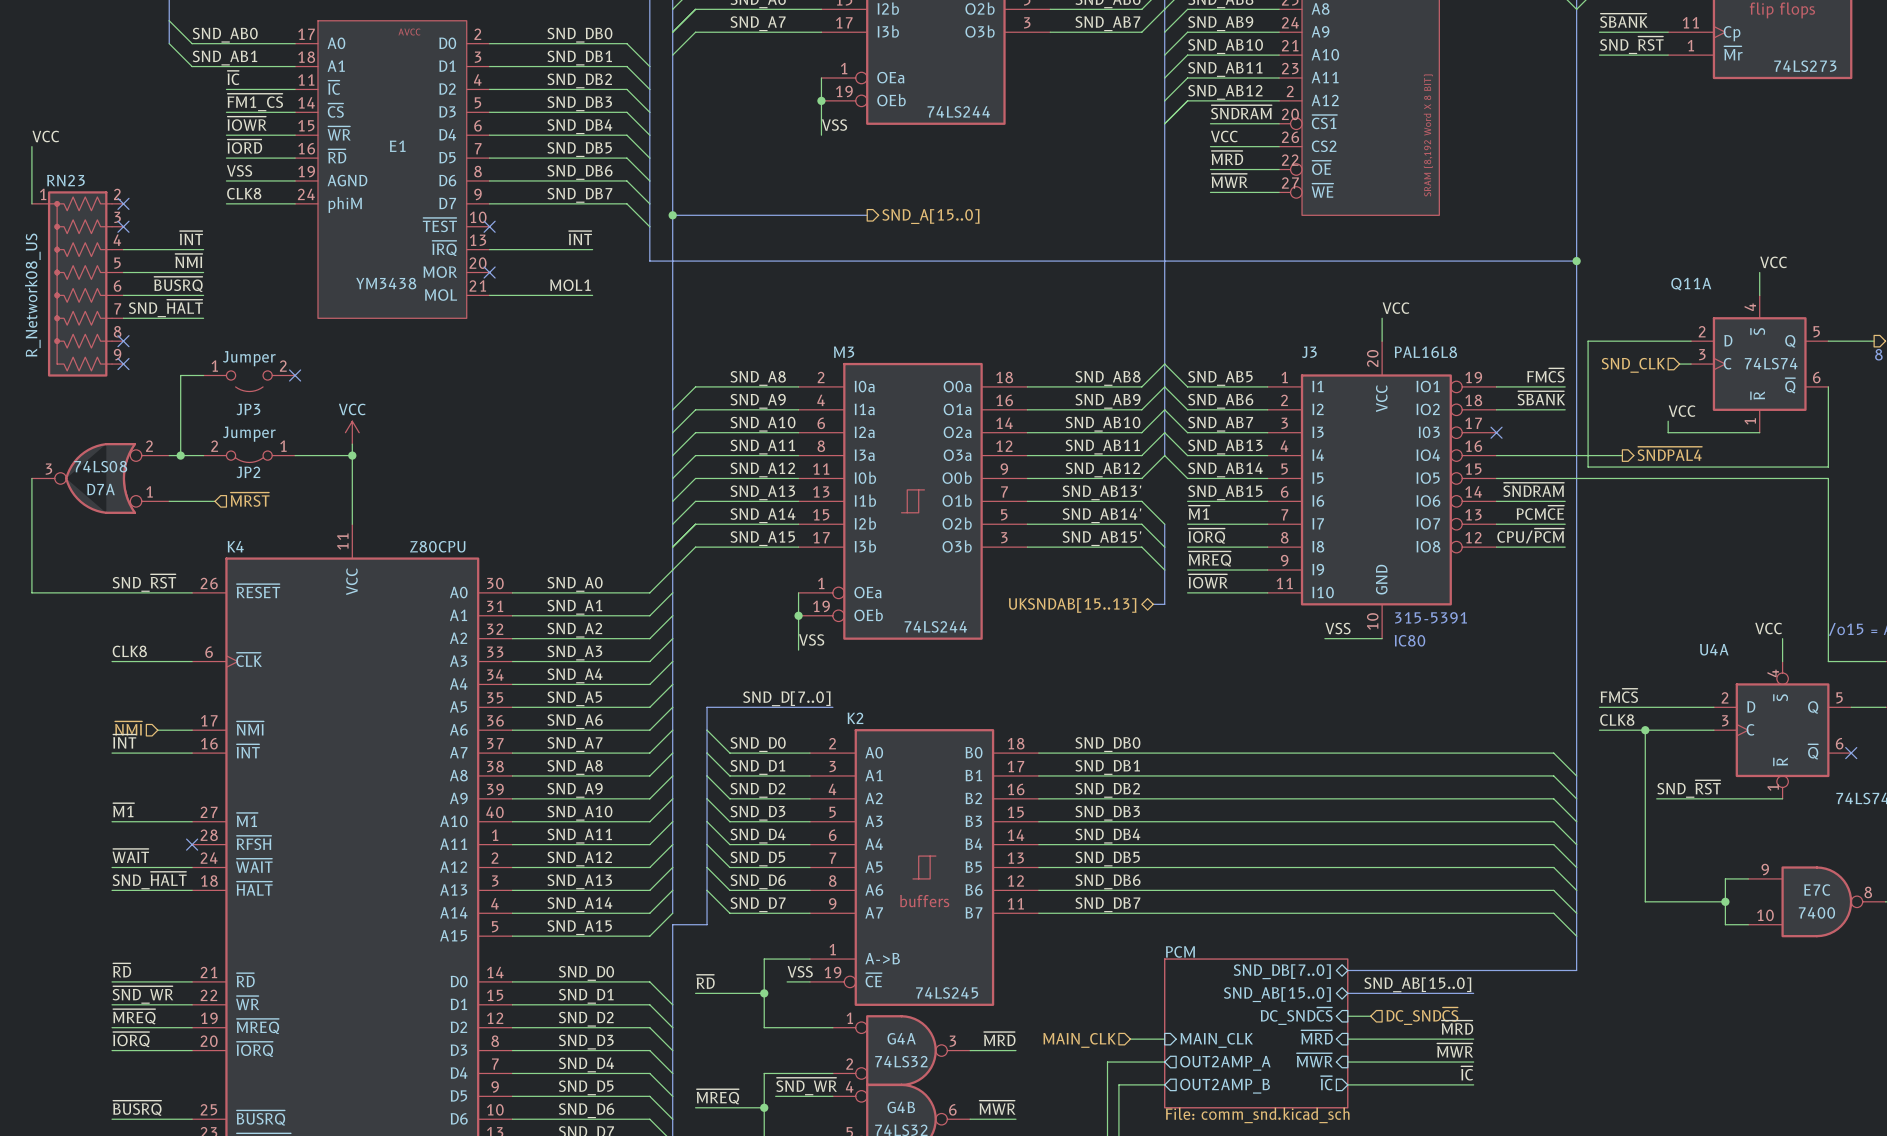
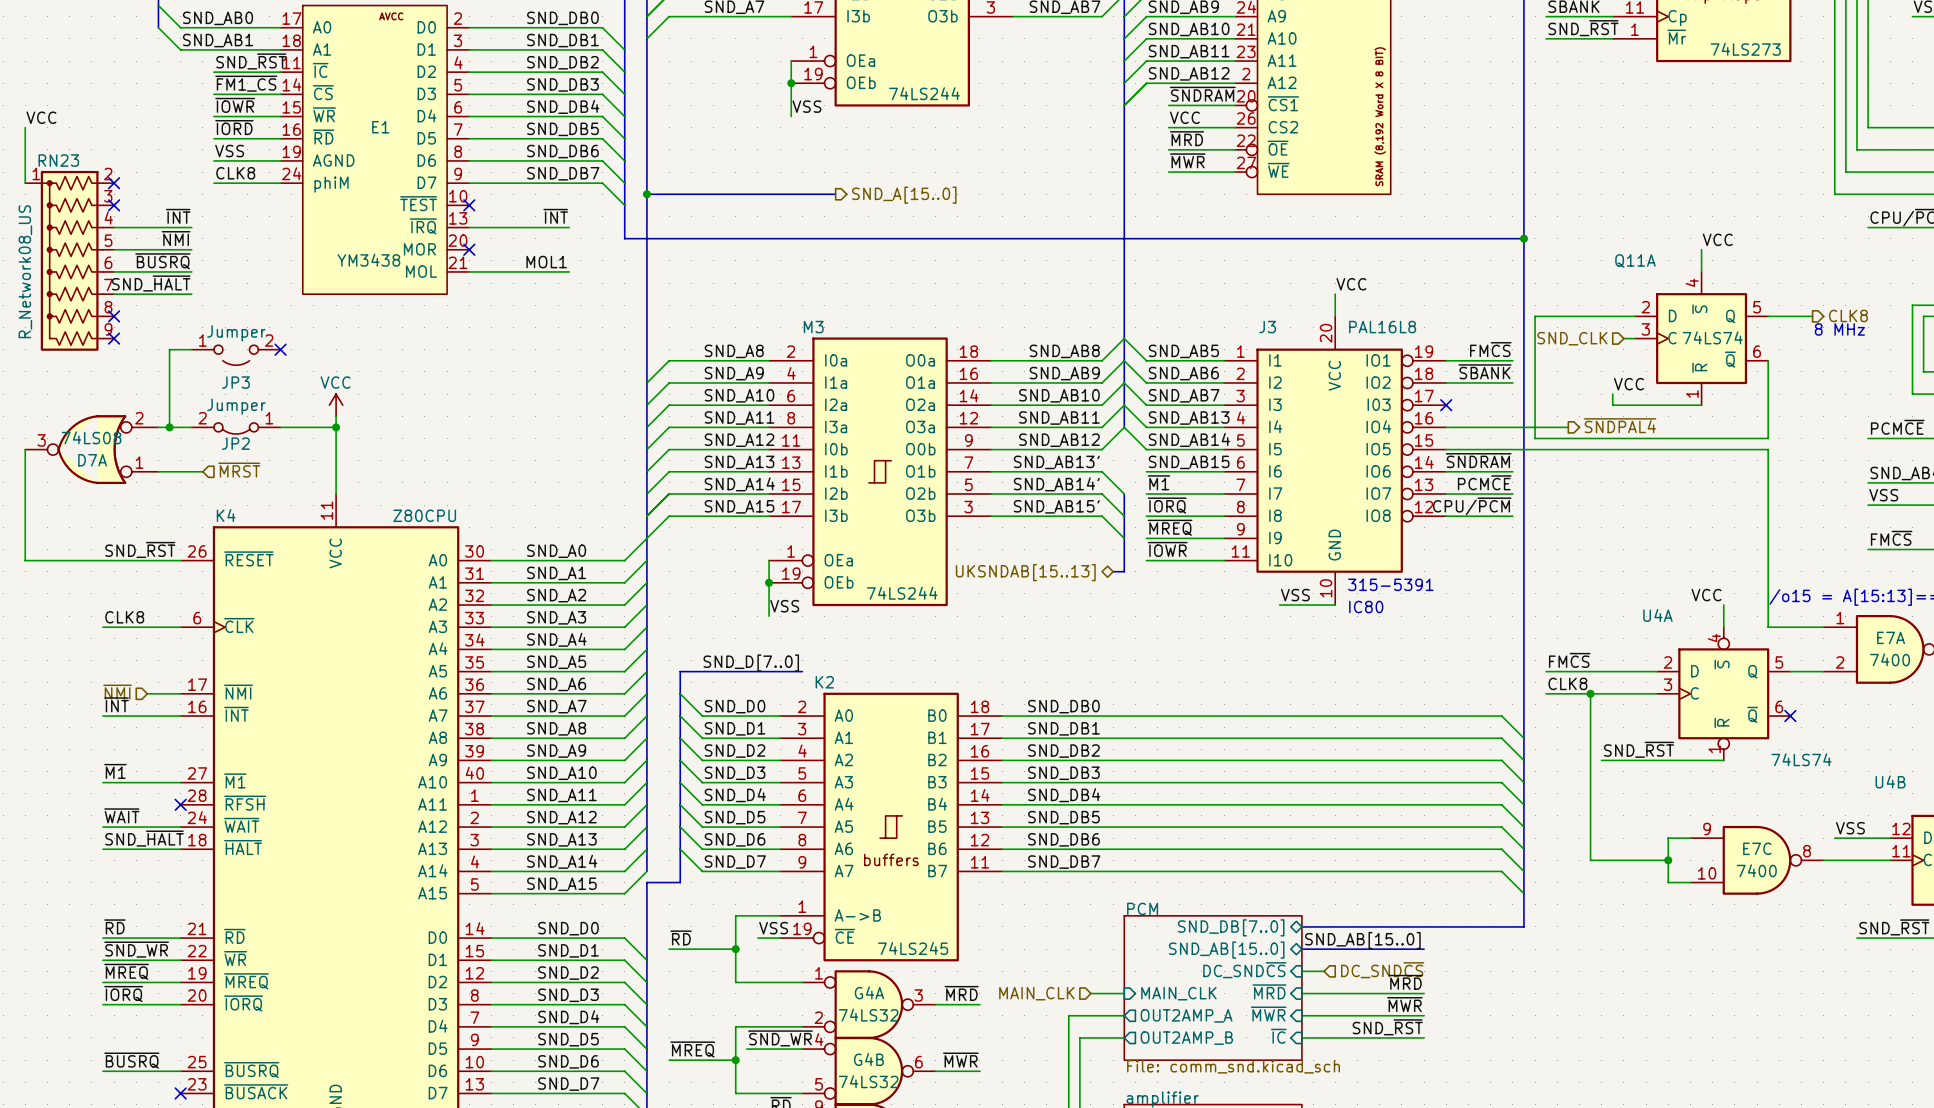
label: ~{IC} (233, 77) -> SND_~{RST} (251, 61)
label: ~{IC} (1467, 1073) -> SND_~{RST} (1387, 1027)
sheet pin shape: output (1326, 1083) -> input (1278, 1036)

